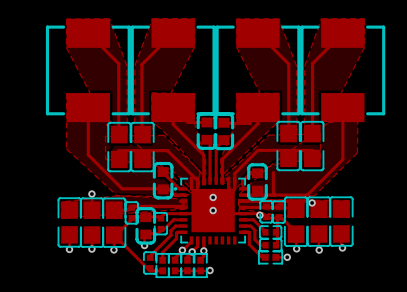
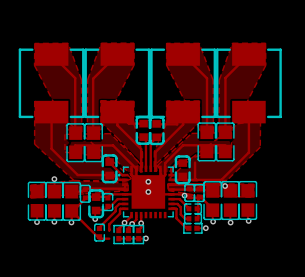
part: (162, 265) -> none

